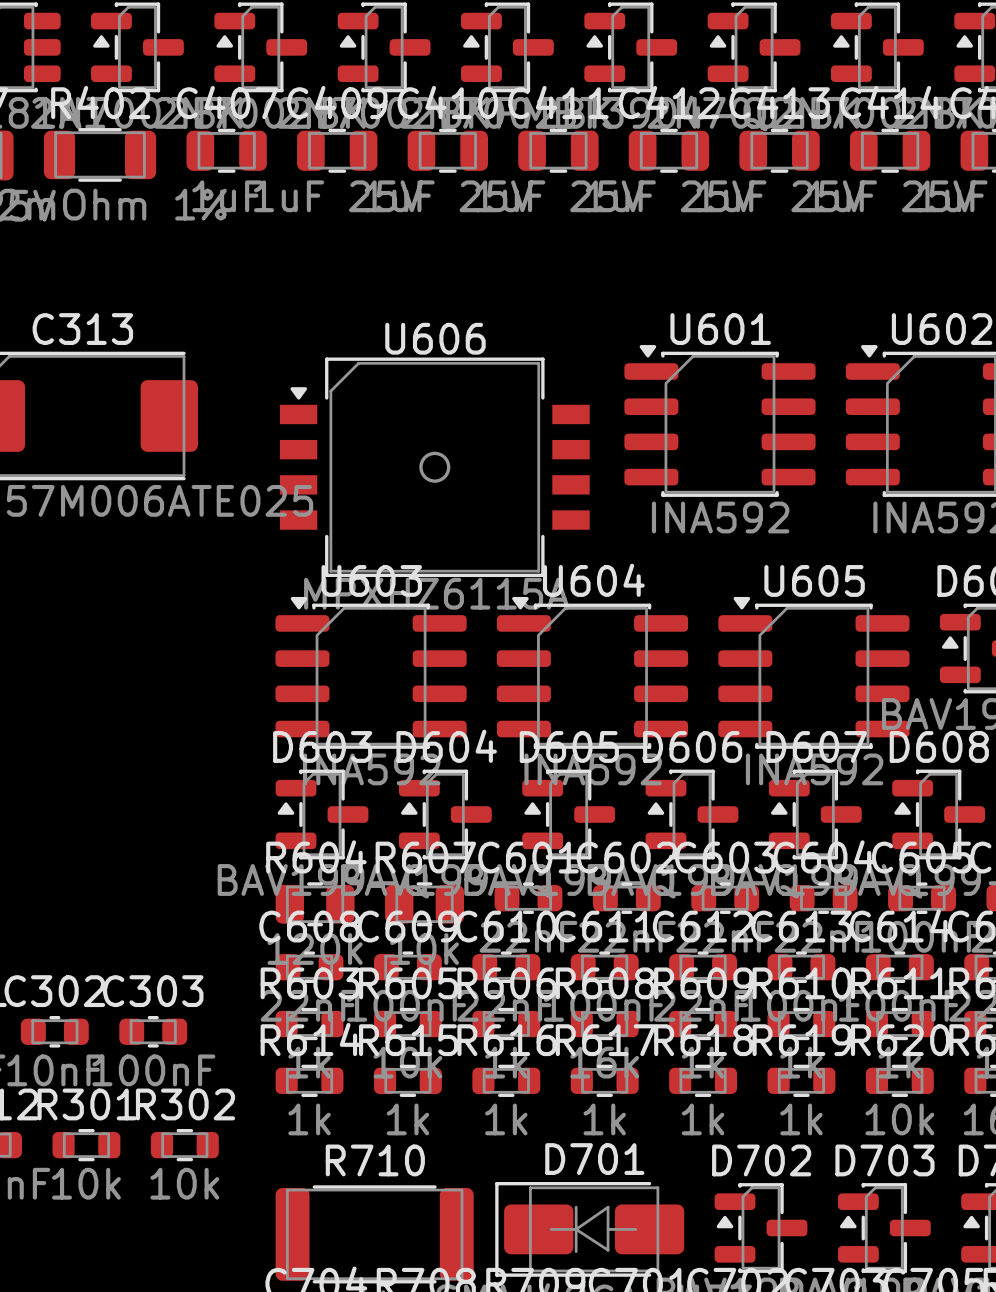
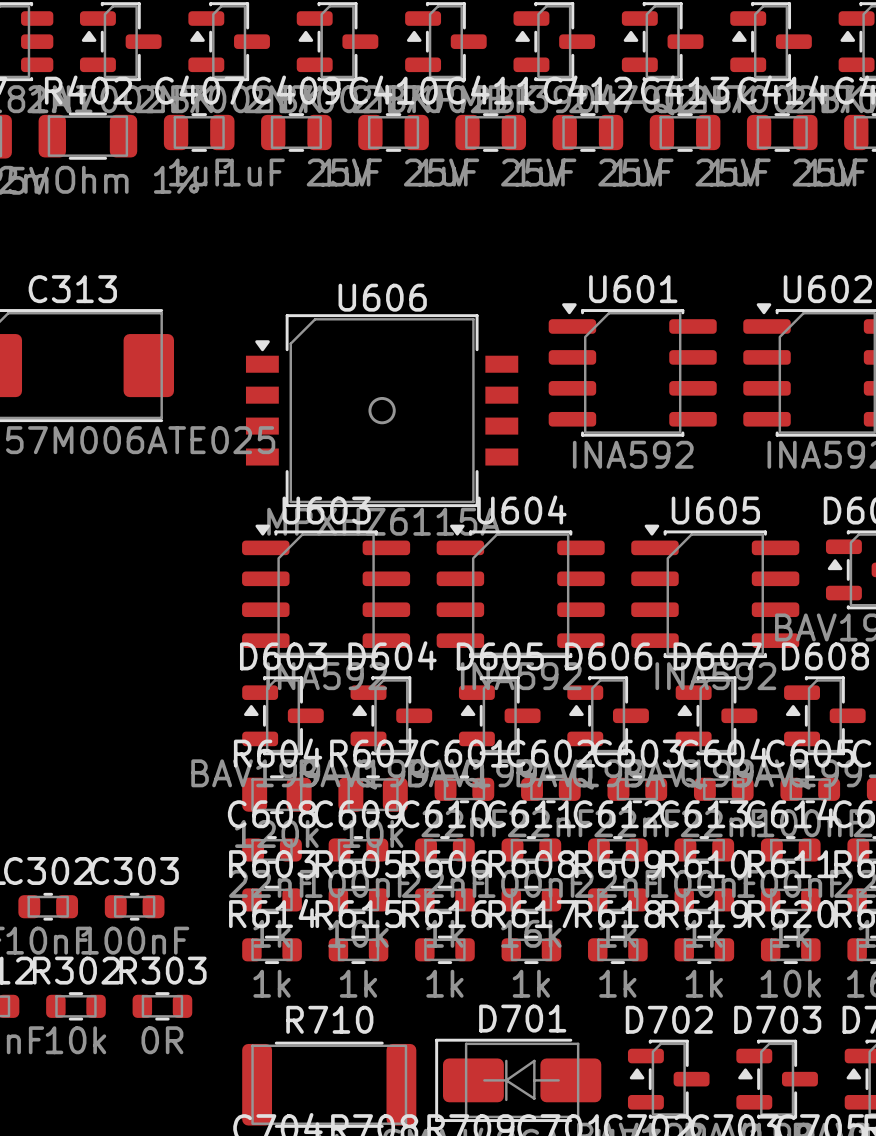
R301 name: R301 (87, 1104) -> R302 (76, 970)
R302 name: R302 (185, 1104) -> R303 (163, 970)
R302 value: 10k (184, 1183) -> 0R (162, 1040)

